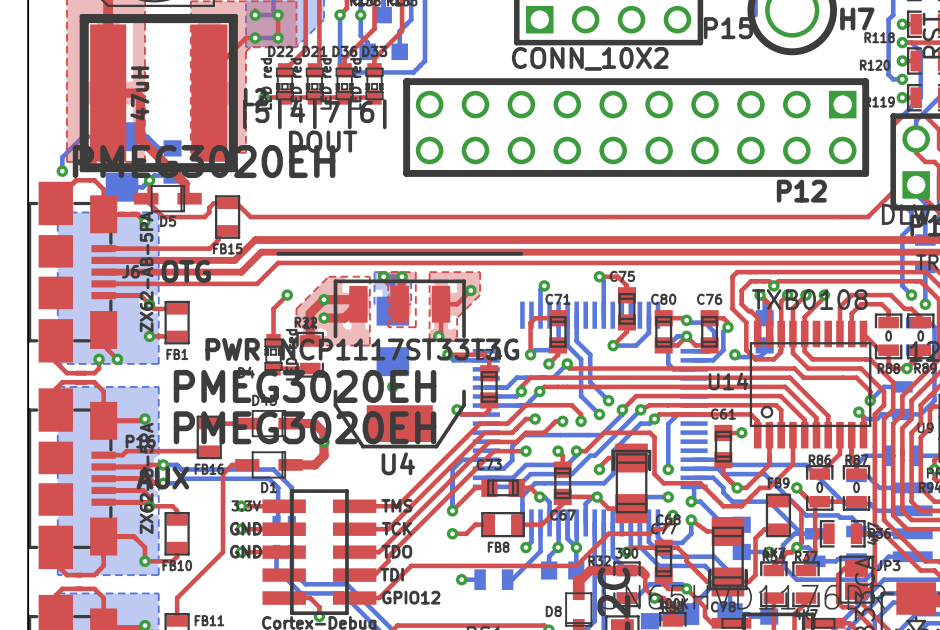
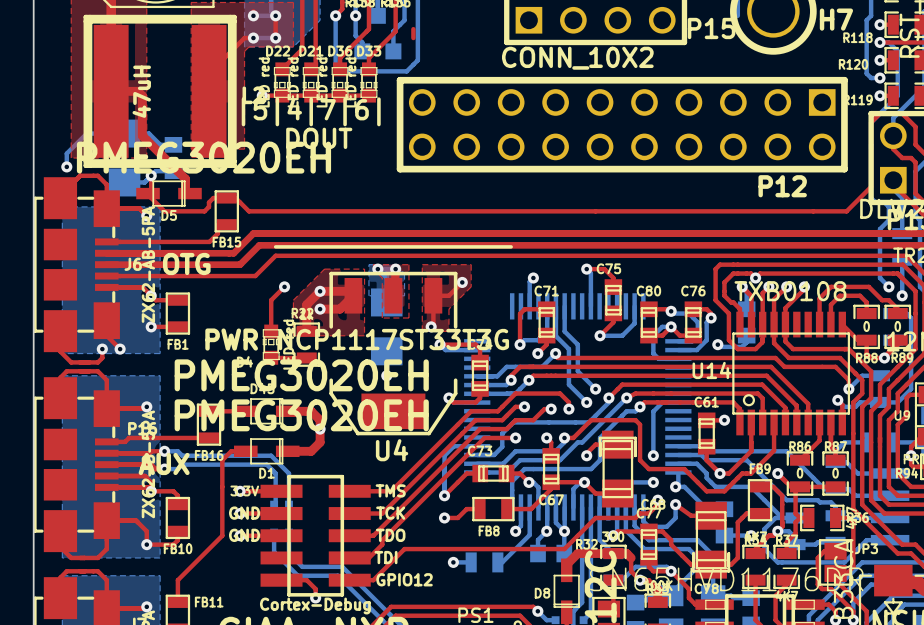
top track: none -> (413, 29) (413, 38)

